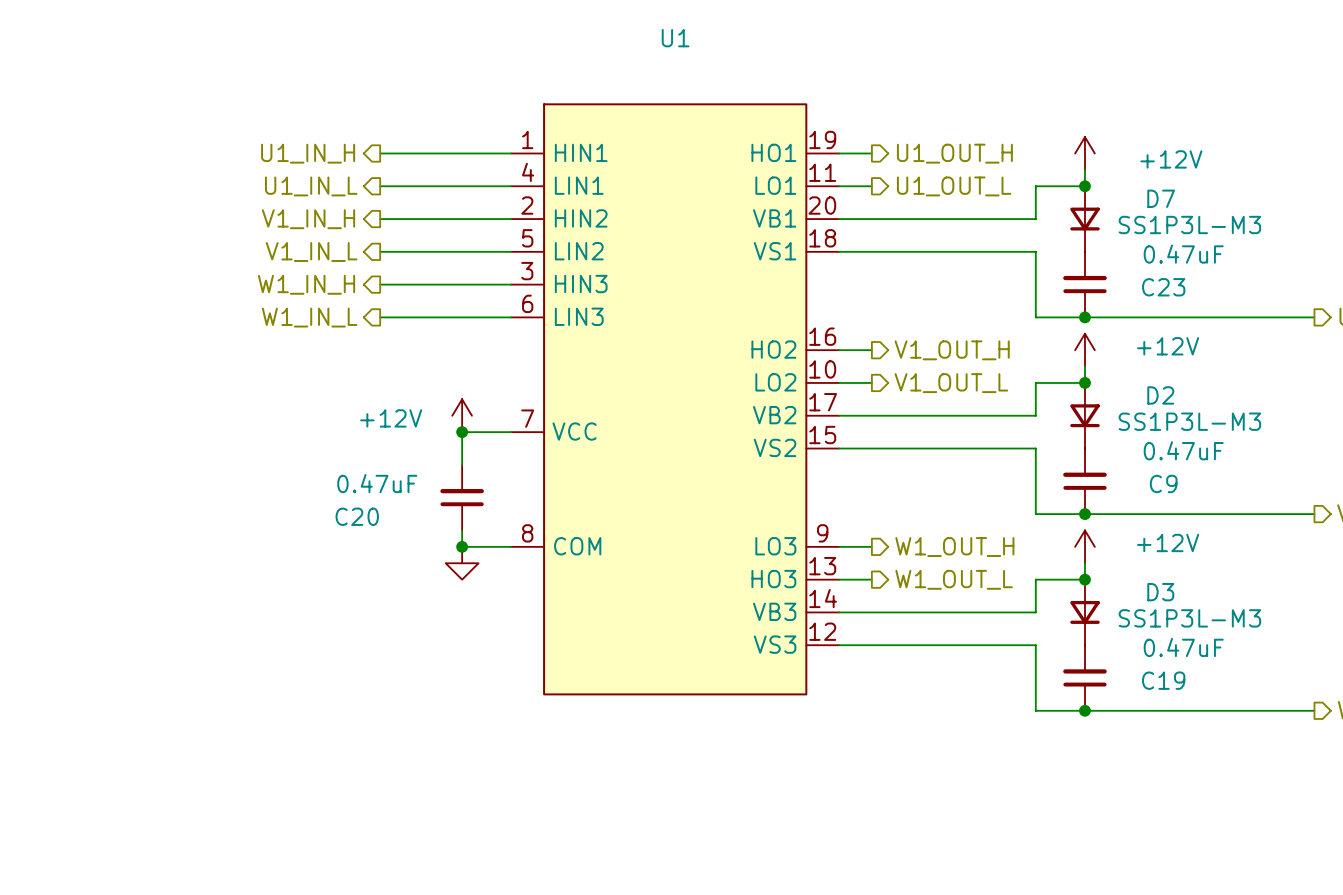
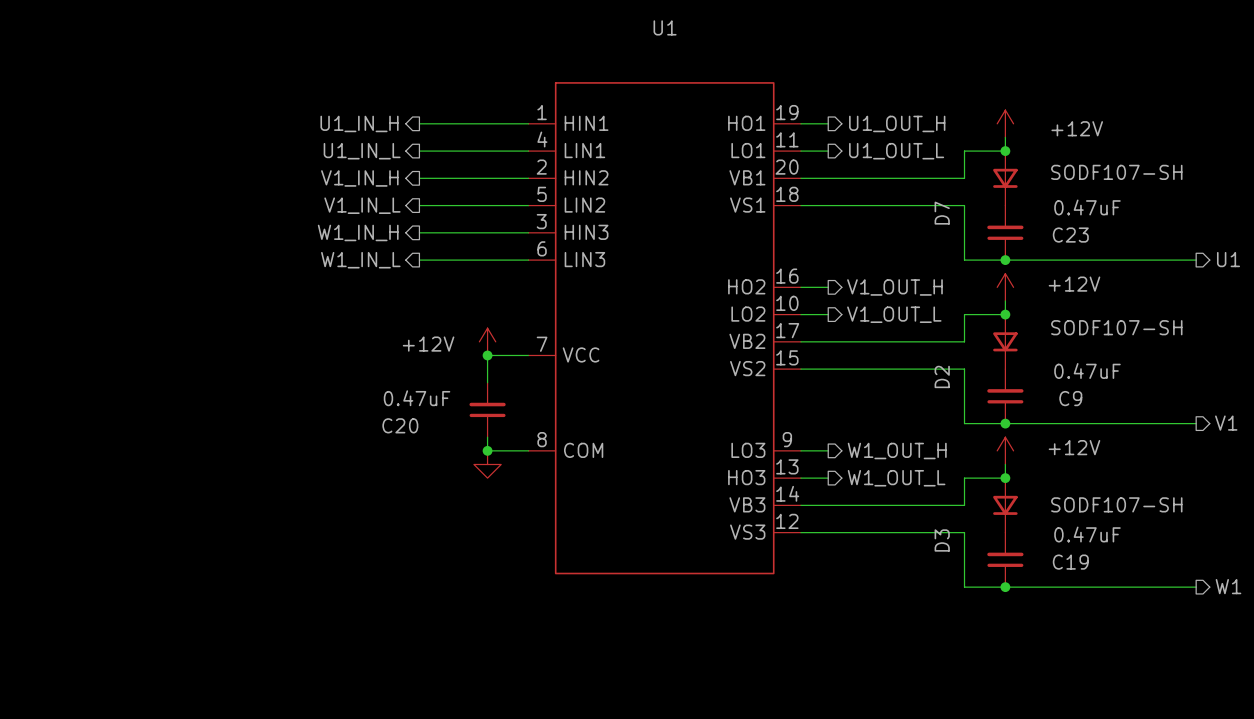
D7 name rotation: 0° (1161, 198) -> 90° counterclockwise (942, 213)
D7 name position: D7 (1161, 198) -> D7 (942, 213)
D7 value: SS1P3L-M3 (1189, 224) -> SODF107-SH (1116, 172)
D2 name rotation: 0° (1160, 395) -> 90° counterclockwise (942, 376)
D2 name position: D2 (1160, 395) -> D2 (942, 376)
D2 value: SS1P3L-M3 (1189, 421) -> SODF107-SH (1116, 327)
D3 name rotation: 0° (1160, 592) -> 90° counterclockwise (942, 540)
D3 name position: D3 (1160, 592) -> D3 (942, 540)
D3 value: SS1P3L-M3 (1189, 618) -> SODF107-SH (1116, 504)

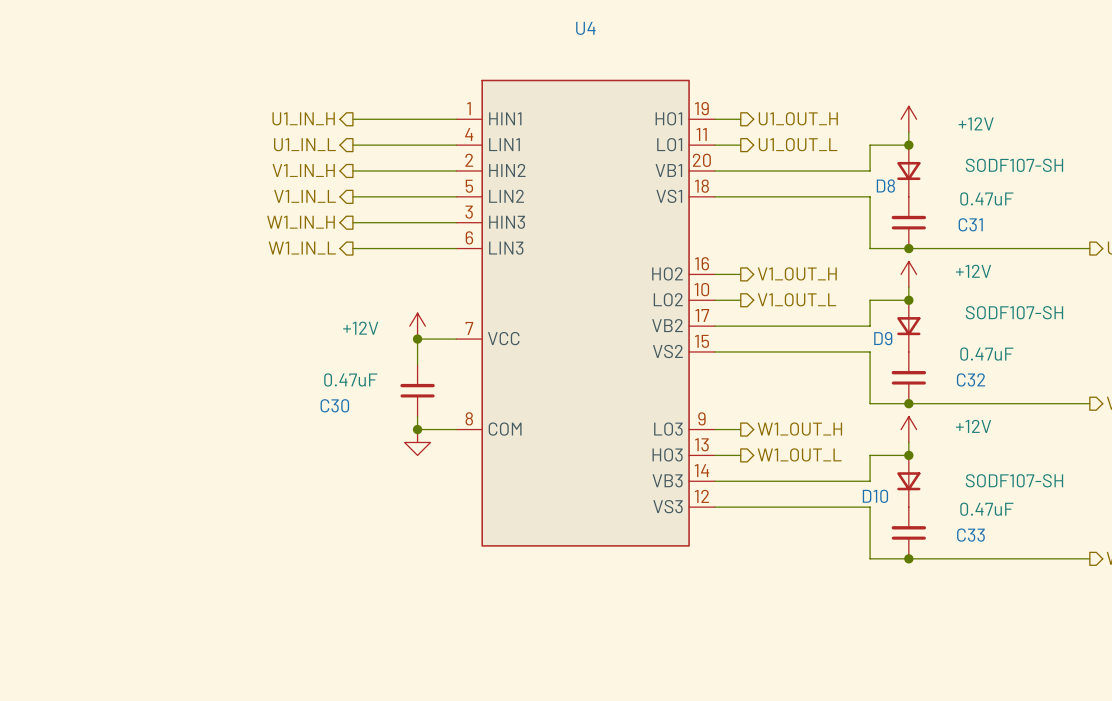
U1 name: U1 (665, 27) -> U4 (585, 28)
D7 name: D7 (942, 213) -> D8 (885, 186)
C23 name: C23 (1070, 235) -> C31 (970, 224)
D2 name: D2 (942, 376) -> D9 (883, 338)
C9 name: C9 (1070, 398) -> C32 (971, 379)
C20 name: C20 (400, 425) -> C30 (334, 405)
D3 name: D3 (942, 540) -> D10 (875, 496)
C19 name: C19 (1070, 562) -> C33 (970, 535)

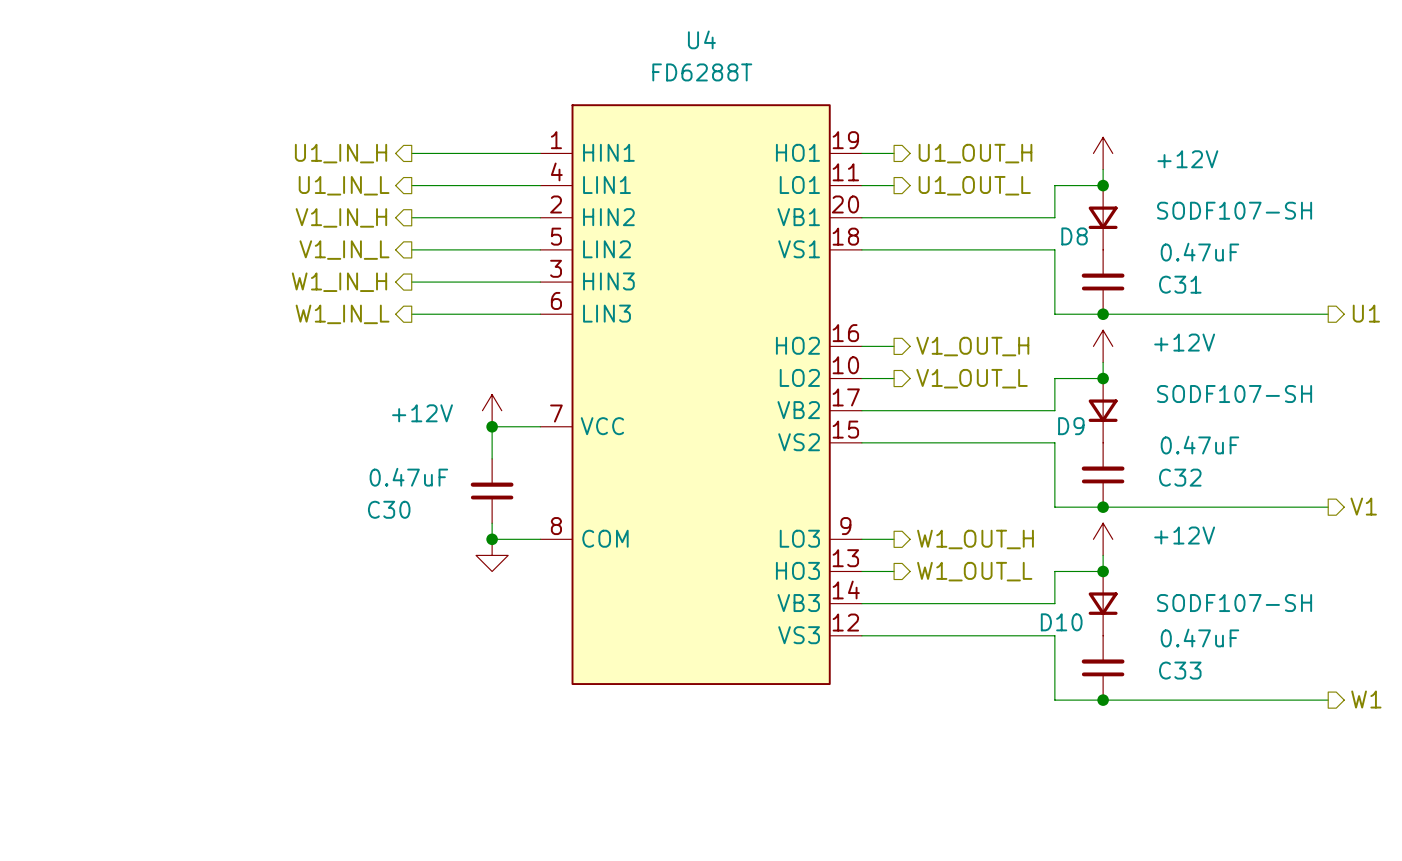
U4 value: none -> FD6288T (702, 72)

